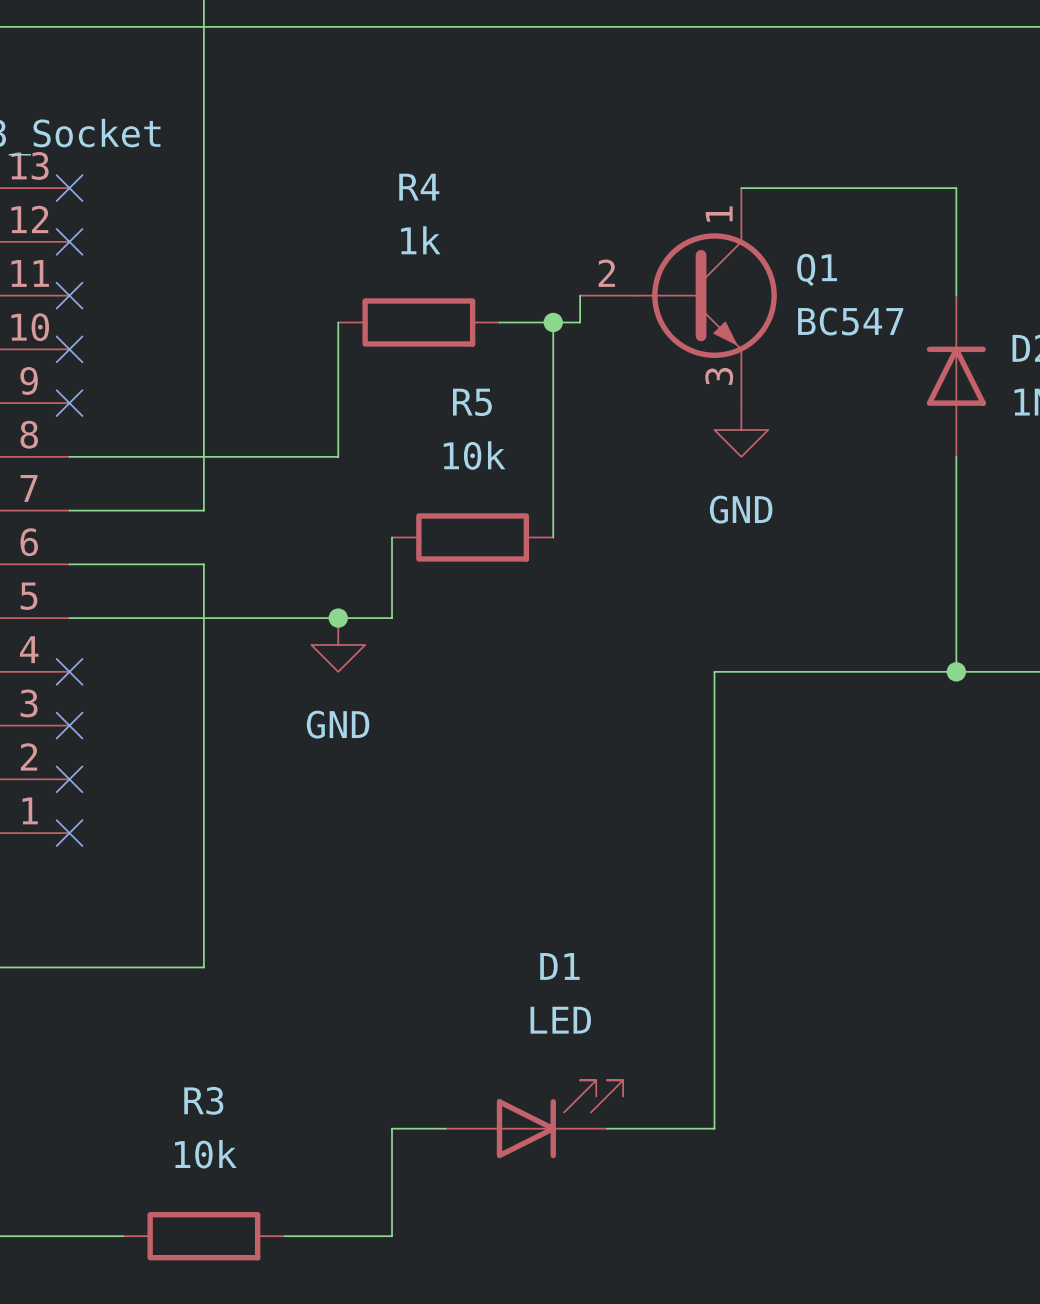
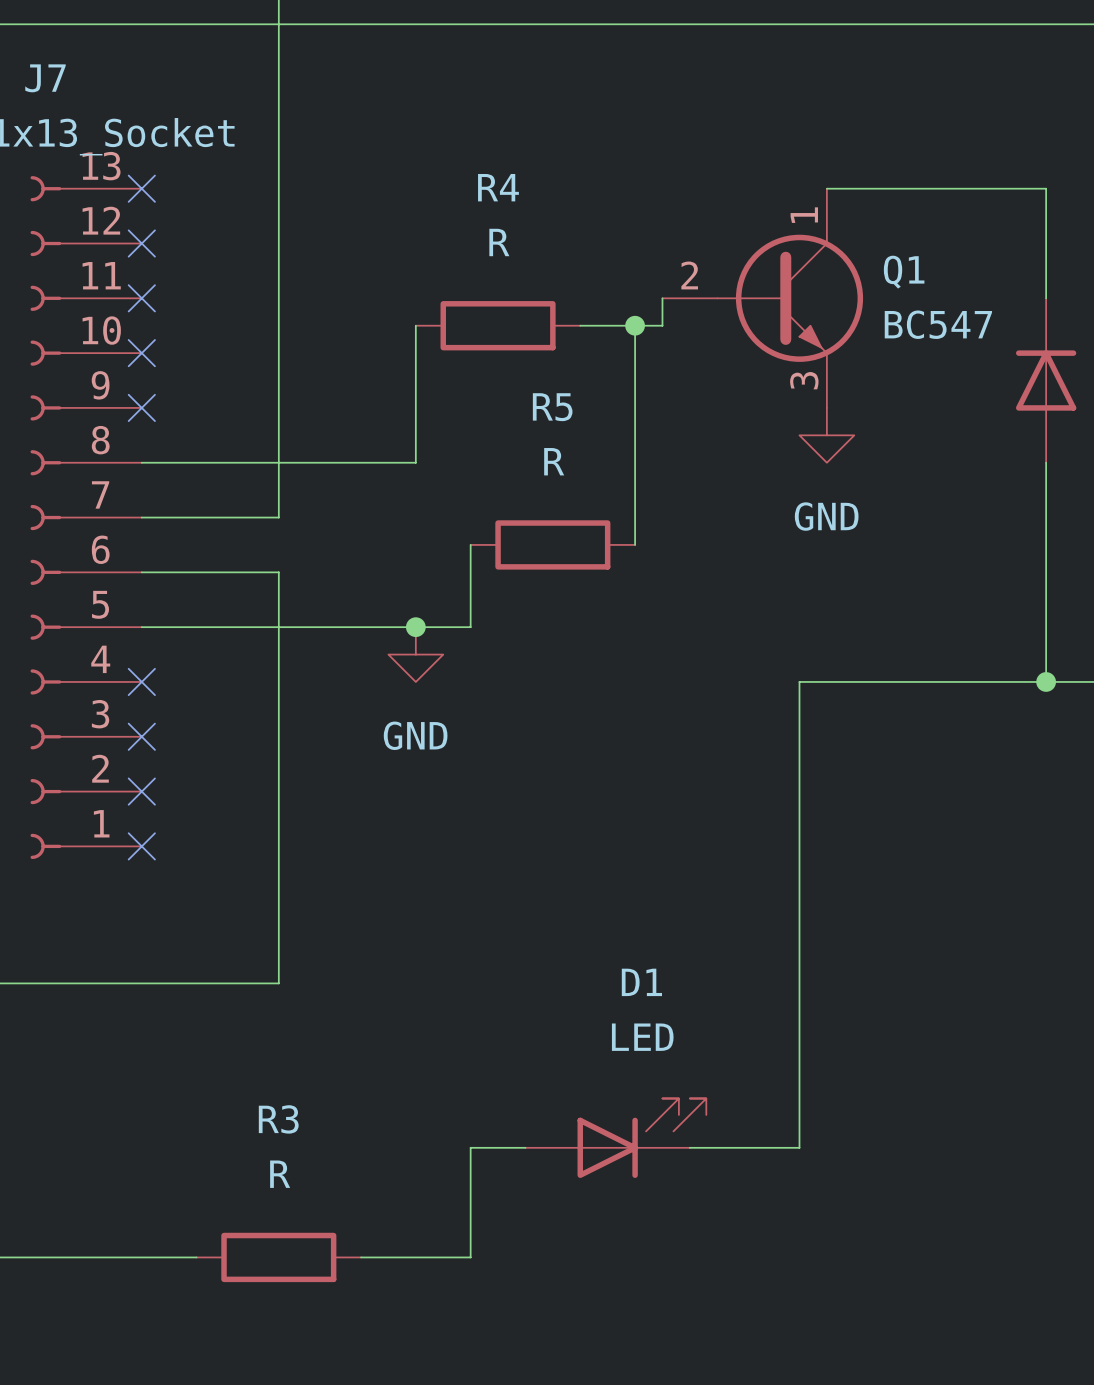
R4 value: 1k (420, 240) -> R (499, 242)
R5 value: 10k (474, 455) -> R (554, 461)
R3 value: 10k (205, 1154) -> R (280, 1174)

